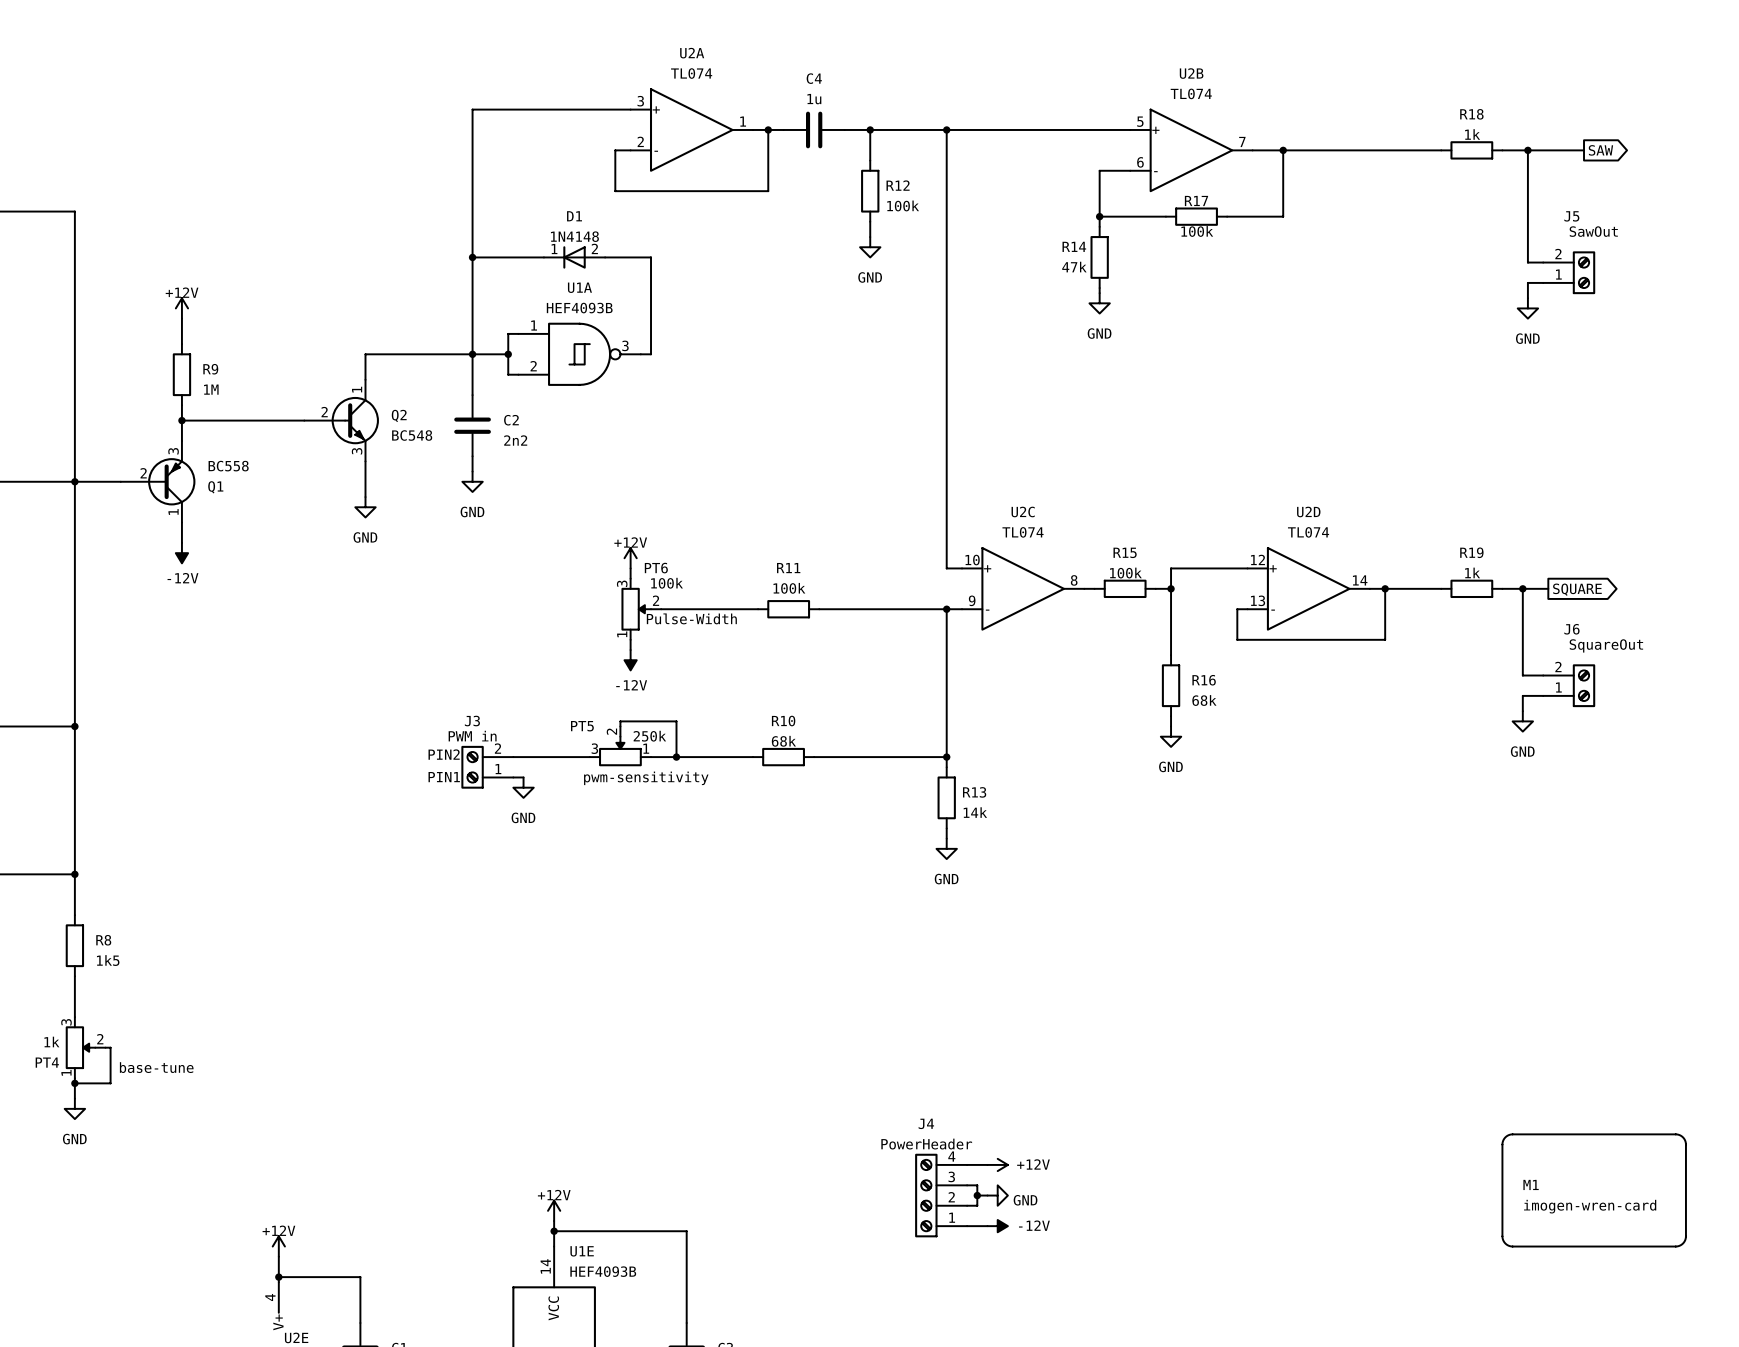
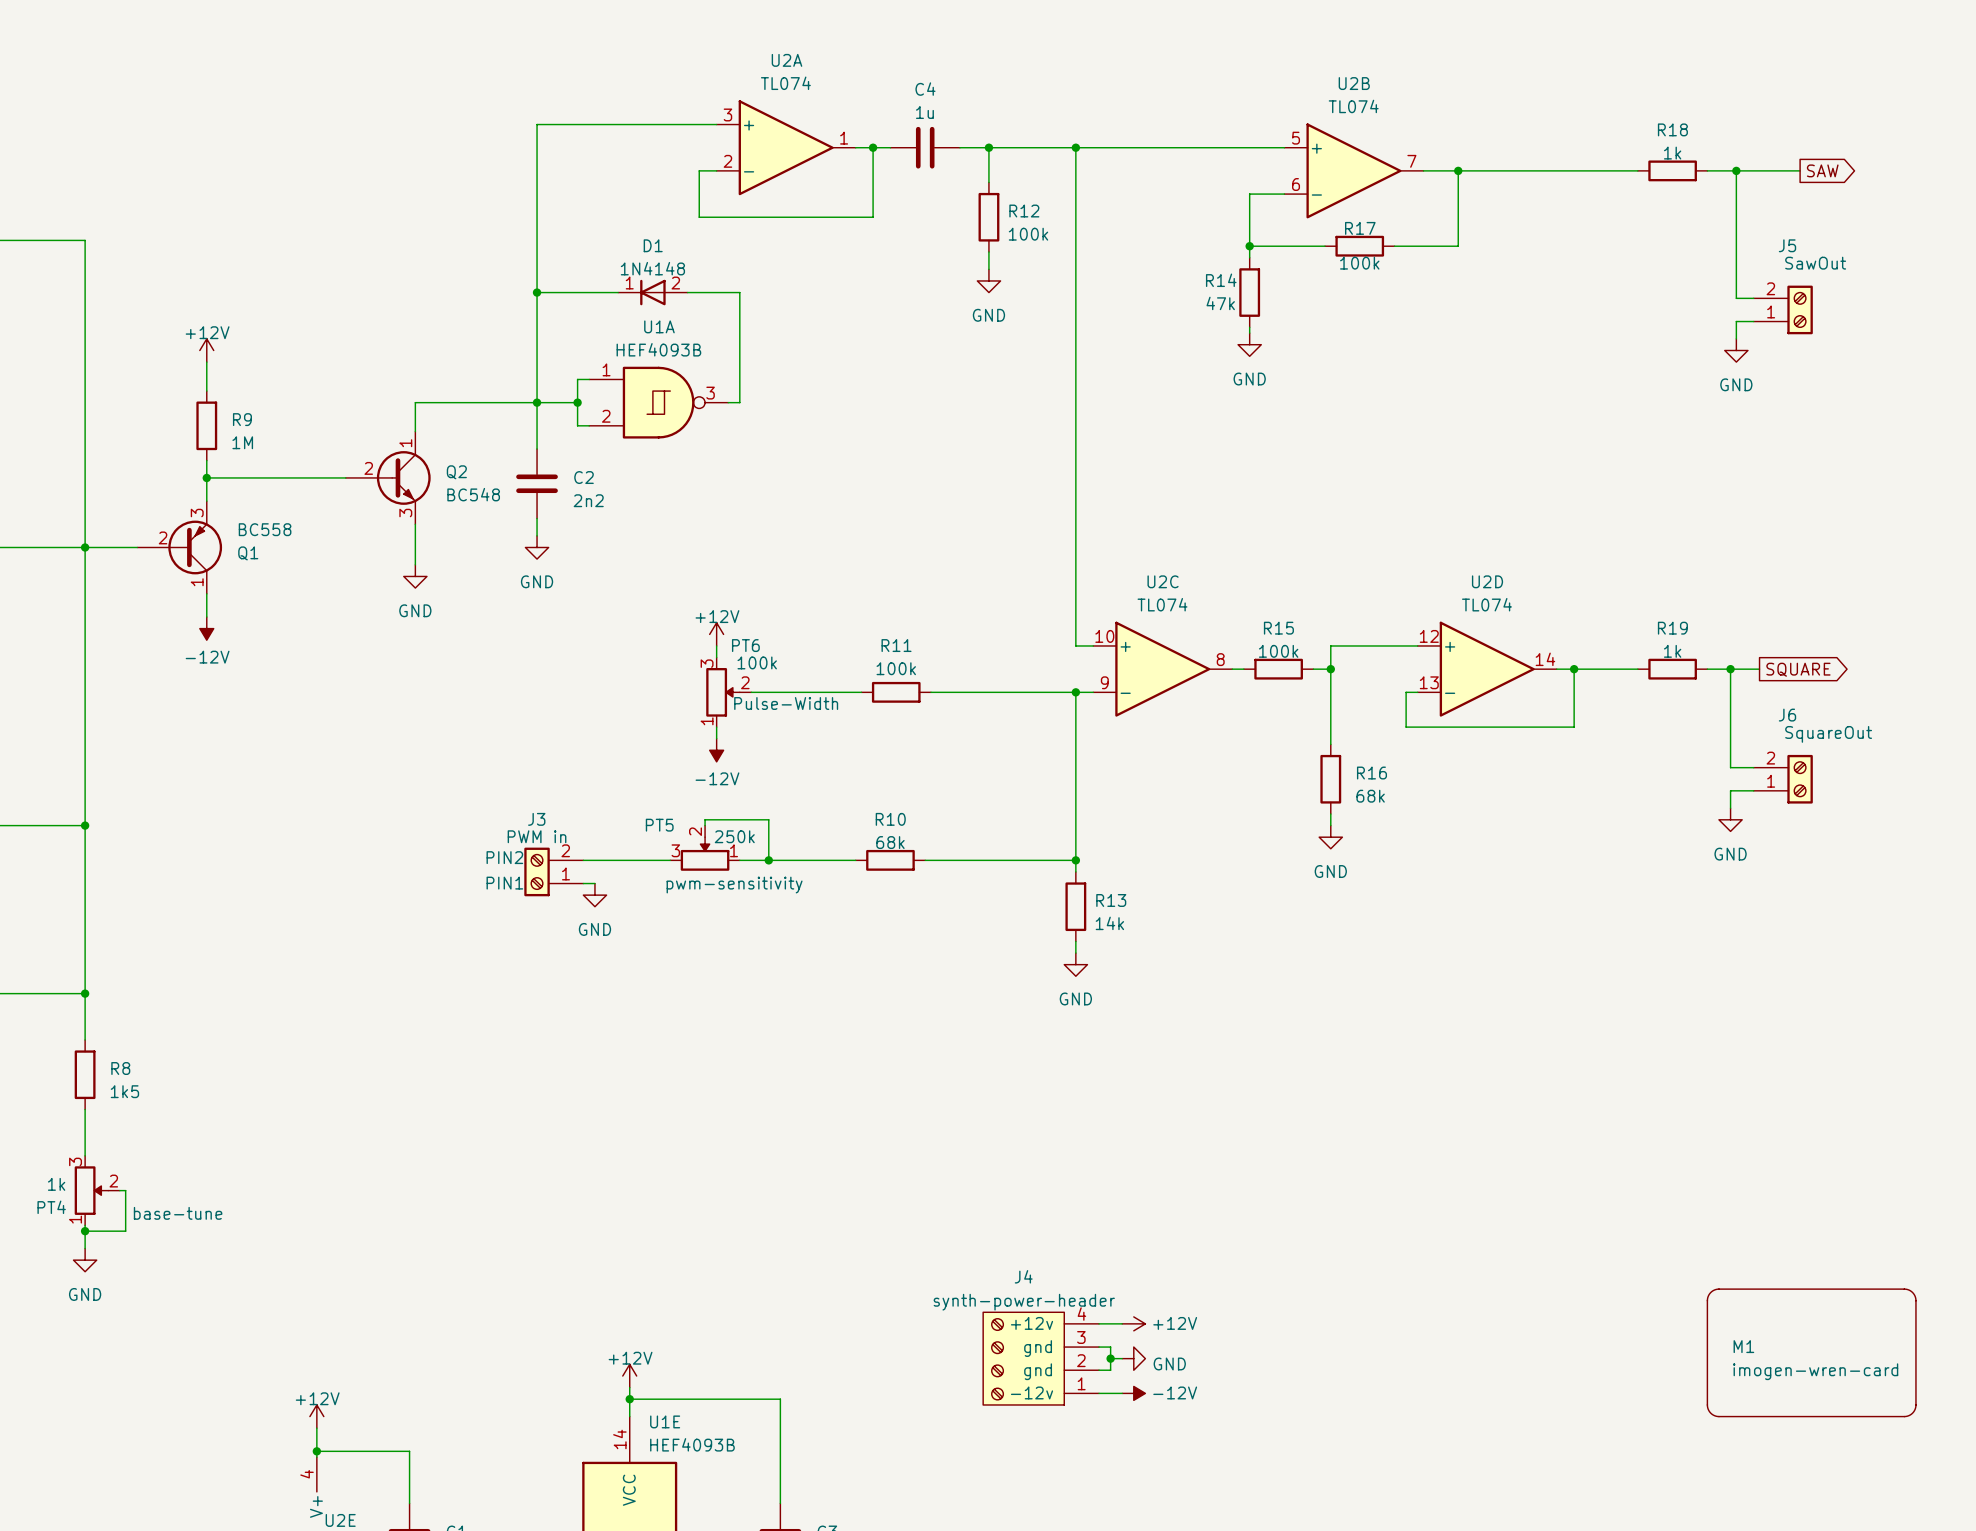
J4 value: PowerHeader (926, 1144) -> synth-power-header (1024, 1302)
J4 symbol: [915, 1153, 968, 1238] -> [983, 1312, 1100, 1405]

